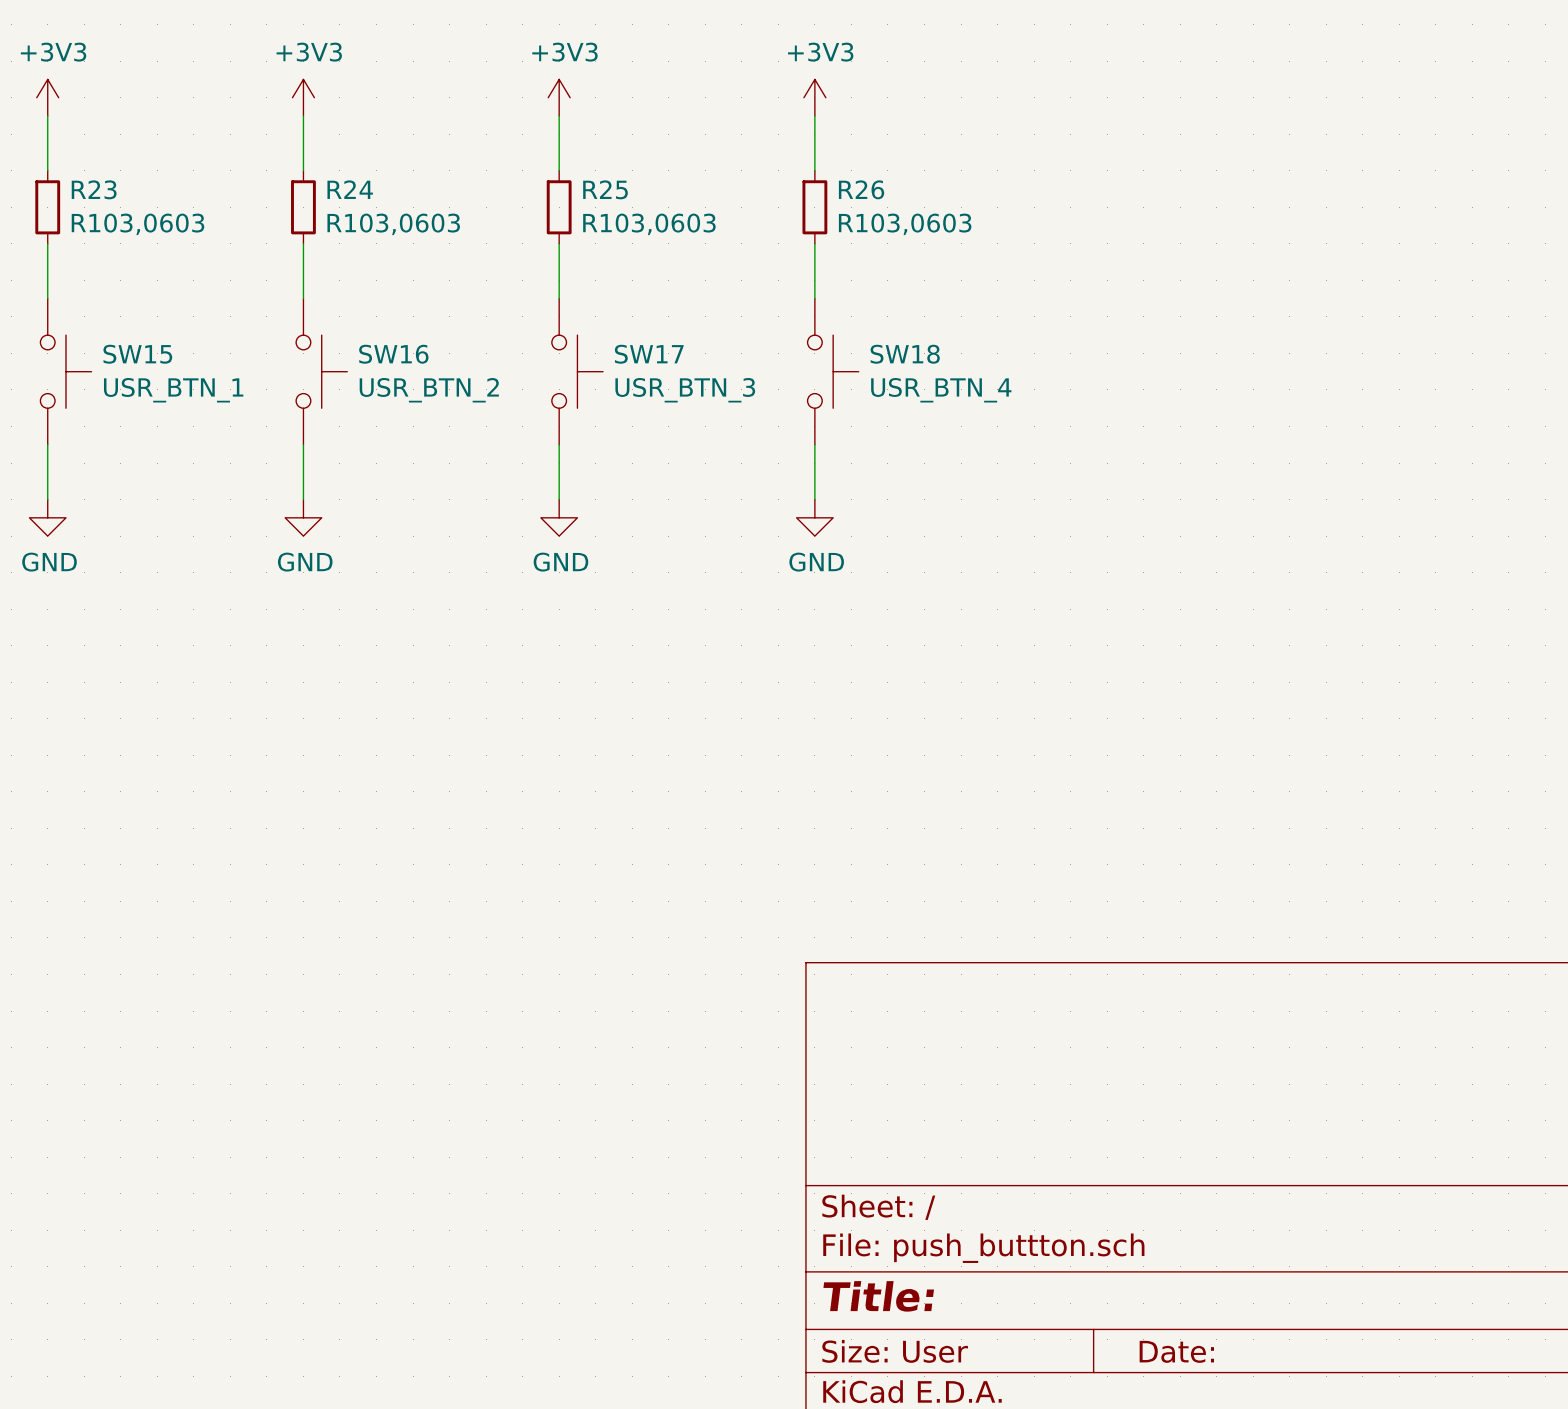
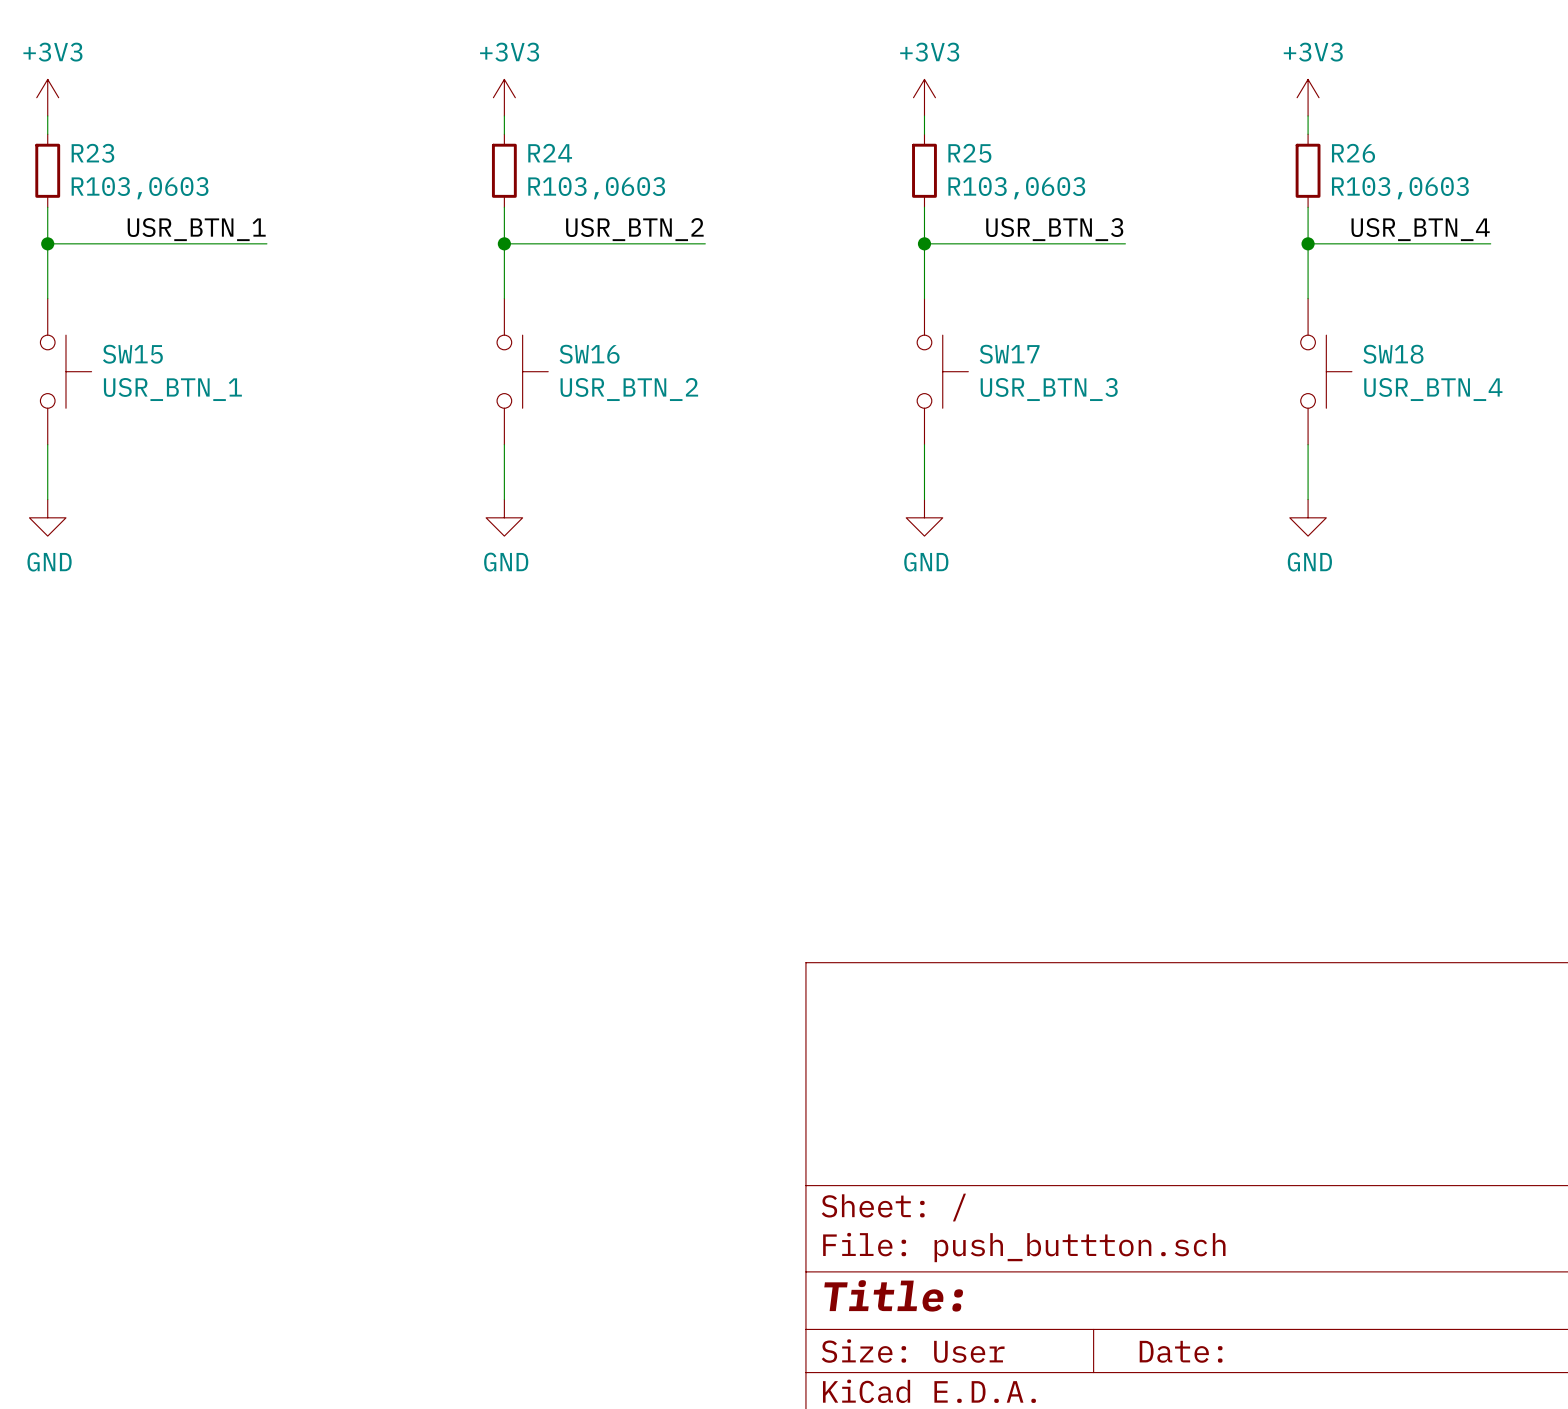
power symbol: +3V3 (303, 97) -> none
power symbol position: +3V3 (559, 97) -> +3V3 (504, 97)
power symbol position: +3V3 (814, 97) -> +3V3 (924, 97)
power symbol: none -> +3V3 (1308, 97)
wire: (303, 115) (303, 170) -> none
wire: none -> (504, 115) (504, 134)
wire: (559, 115) (559, 170) -> none
wire: (814, 115) (814, 170) -> none
wire: none -> (924, 115) (924, 134)
wire: none -> (1308, 115) (1308, 134)
wire: (47, 134) (47, 170) -> none
wire: none -> (47, 207) (47, 243) (266, 243)
R23 position: (47, 207) -> (47, 170)
R24 position: (303, 207) -> (504, 170)
wire: none -> (504, 207) (504, 298)
R25 position: (559, 207) -> (924, 170)
R26 position: (814, 207) -> (1308, 170)
wire: none -> (924, 207) (924, 298)
wire: none -> (1308, 207) (1308, 298)
label: none -> USR_BTN_1 (196, 229)
label: none -> USR_BTN_2 (634, 229)
label: none -> USR_BTN_3 (1054, 229)
label: none -> USR_BTN_4 (1420, 229)
junction: none -> (47, 243)
wire: (303, 243) (303, 298) -> none
wire: none -> (504, 243) (705, 243)
junction: none -> (504, 243)
wire: (559, 243) (559, 298) -> none
wire: (814, 243) (814, 298) -> none
wire: none -> (924, 243) (1125, 243)
junction: none -> (924, 243)
wire: none -> (1308, 243) (1490, 243)
junction: none -> (1308, 243)
SW16 position: (321, 371) -> (522, 371)
SW17 position: (577, 371) -> (942, 371)
SW18 position: (833, 371) -> (1326, 371)
wire: (303, 444) (303, 499) -> none
wire: (559, 444) (559, 499) -> (504, 444) (504, 499)
wire: (814, 444) (814, 499) -> (924, 444) (924, 499)
wire: none -> (1308, 444) (1308, 499)
power symbol: GND (303, 517) -> none
power symbol position: GND (559, 517) -> GND (504, 517)
power symbol position: GND (814, 517) -> GND (924, 517)
power symbol: none -> GND (1308, 517)

